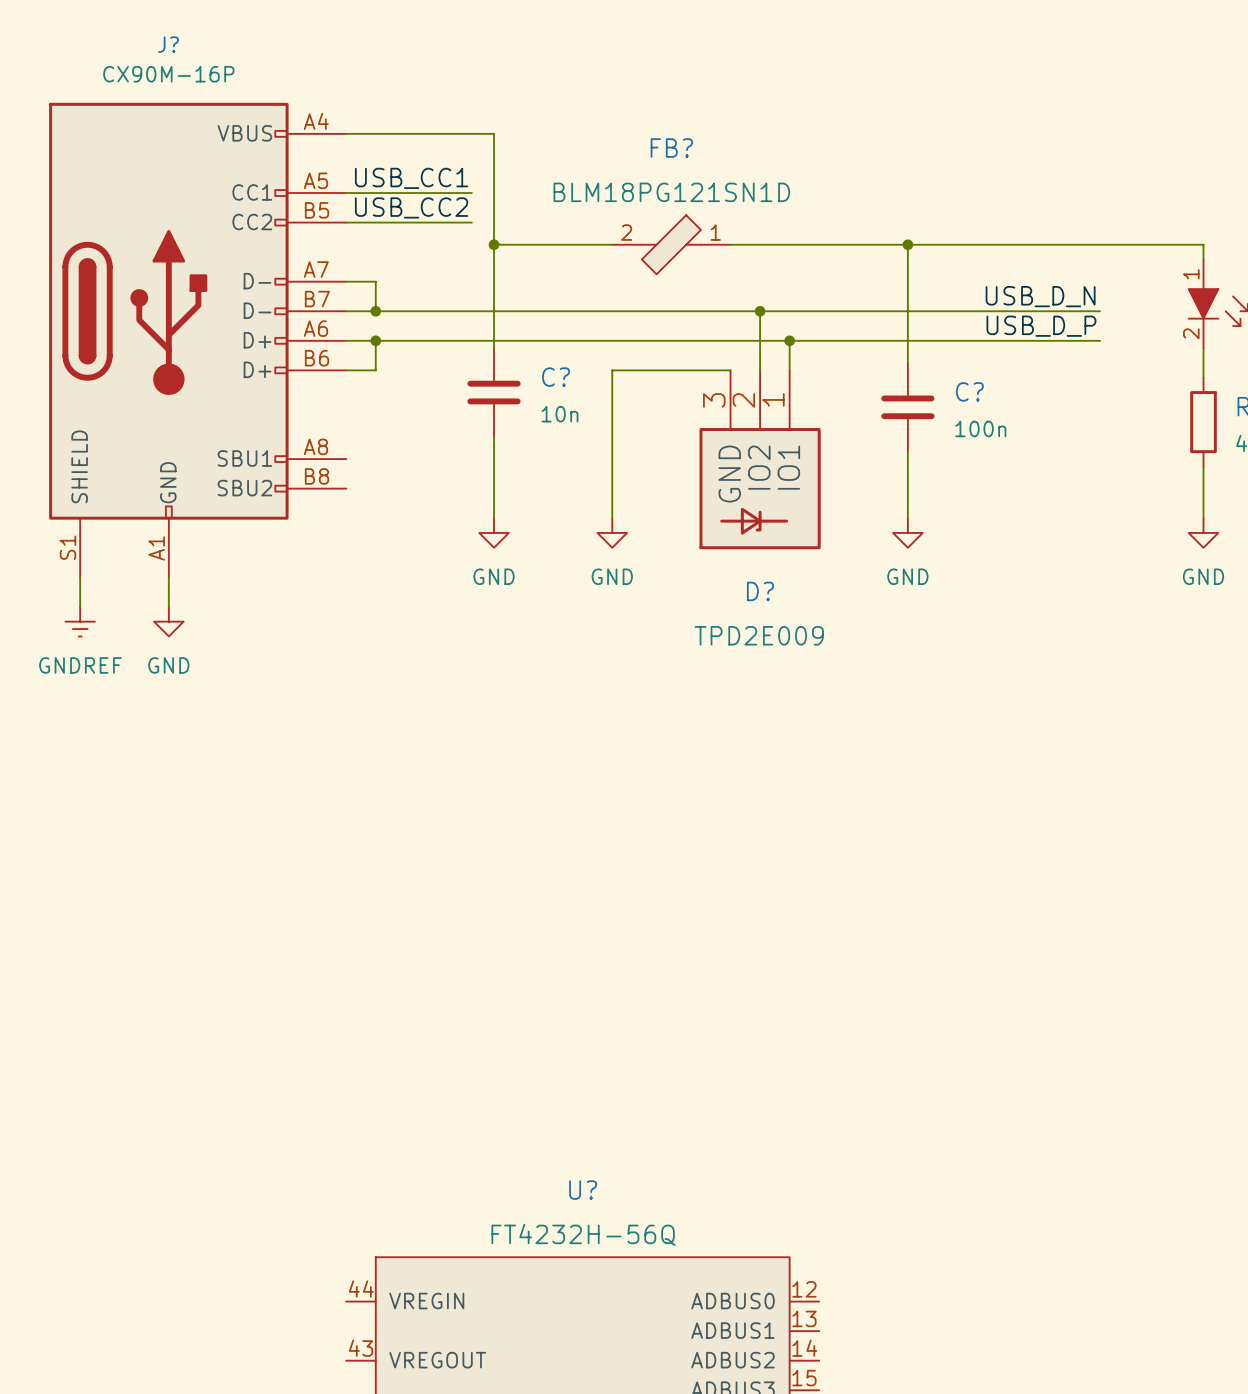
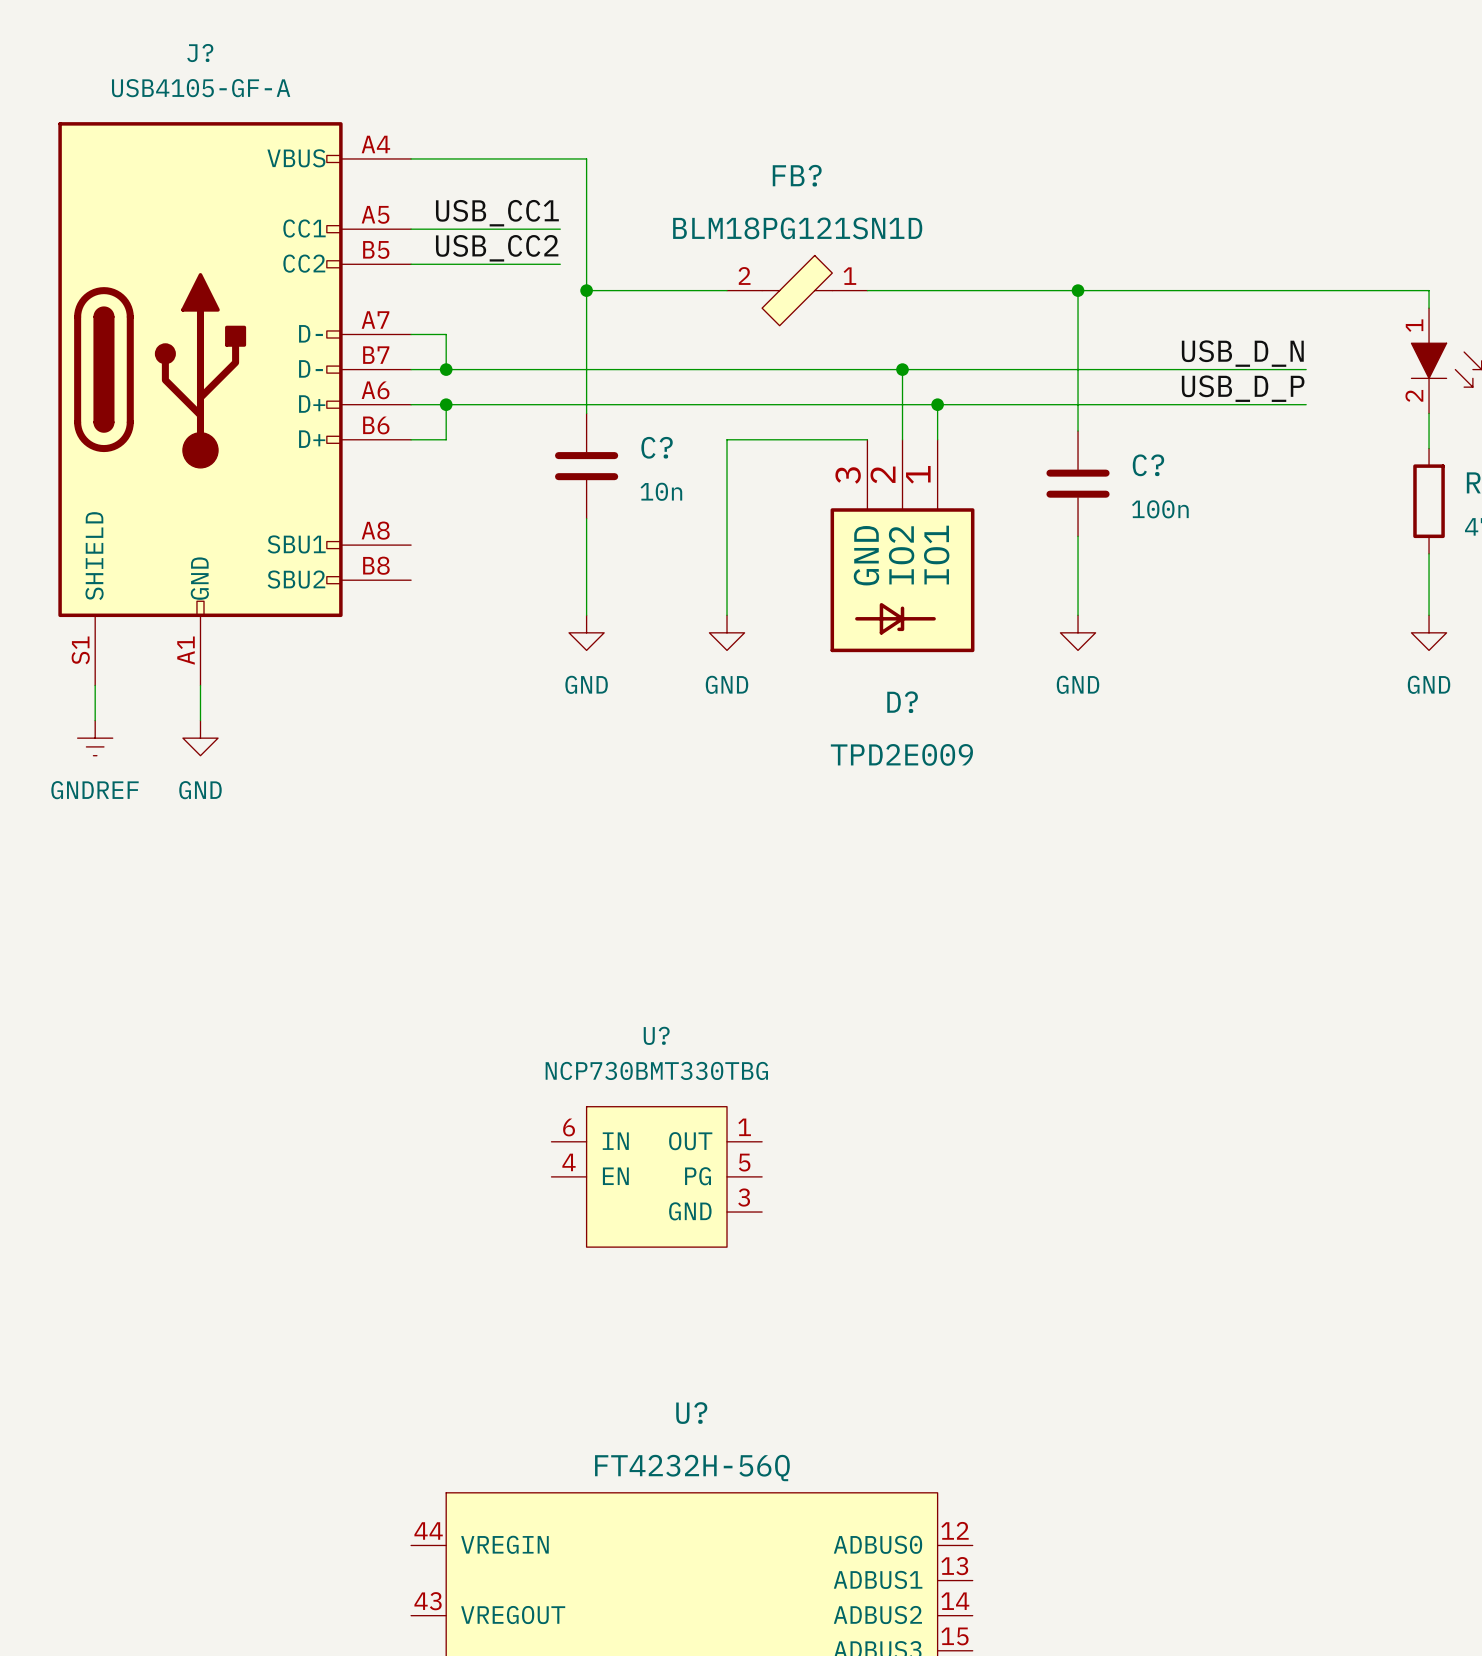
J? value: CX90M-16P (168, 74) -> USB4105-GF-A (201, 88)
U?: none -> NCP730BMT330TBG (656, 1176)

